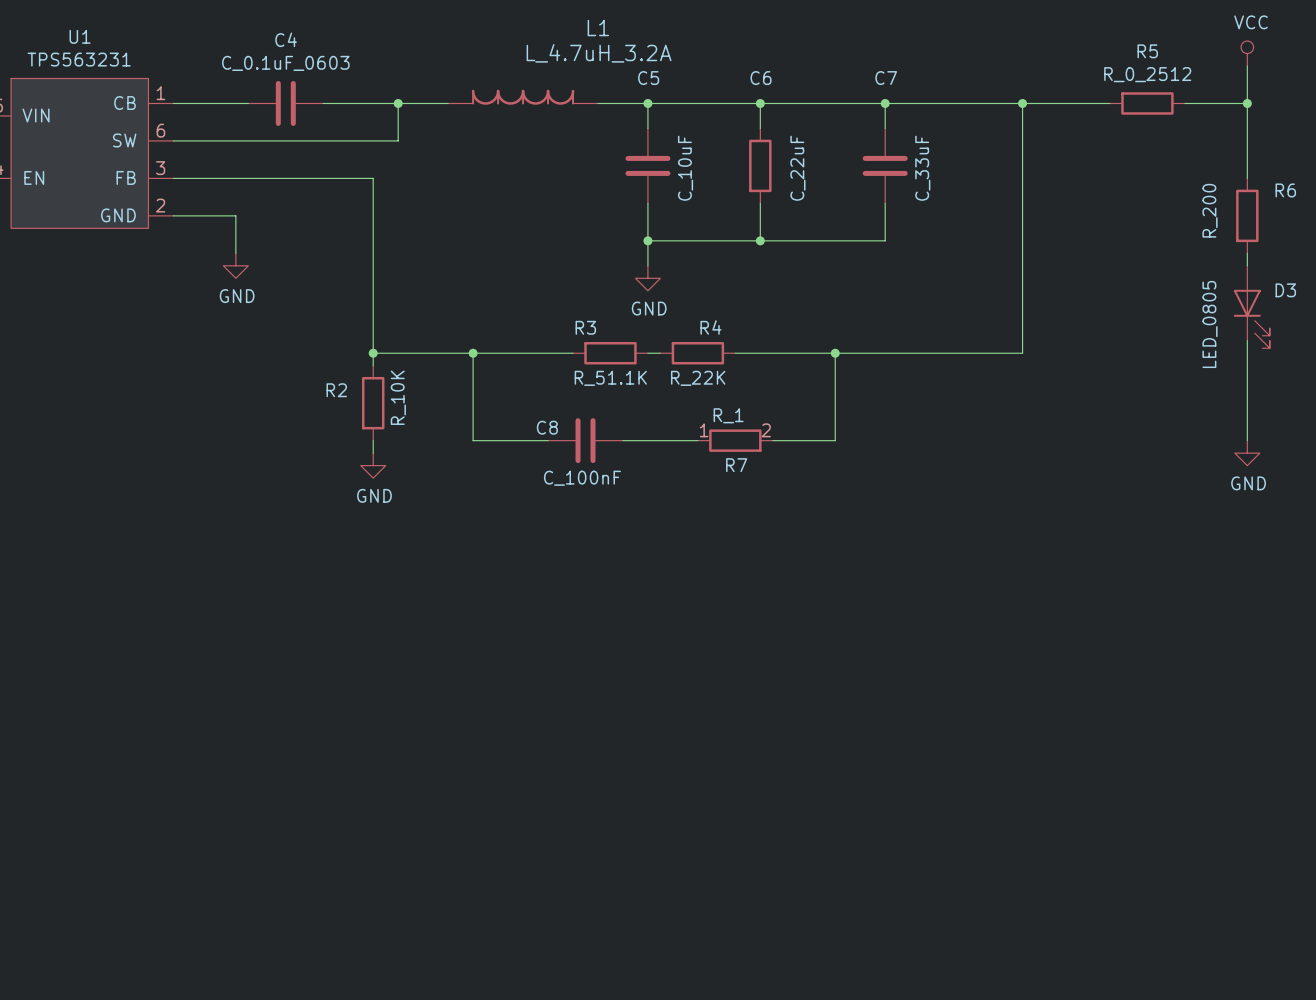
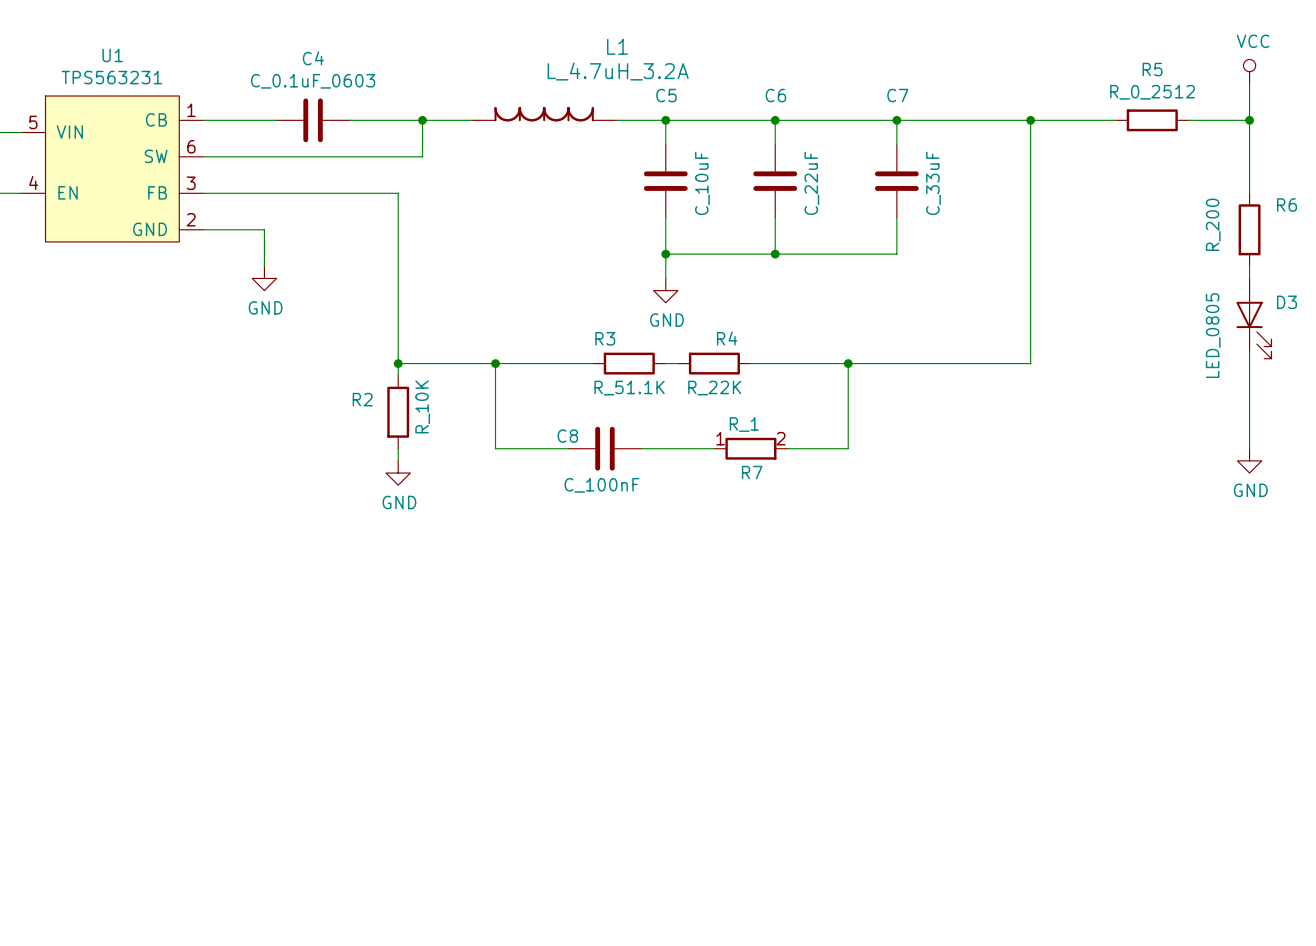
C6 symbol: [749, 128, 772, 204] -> [753, 144, 798, 218]

